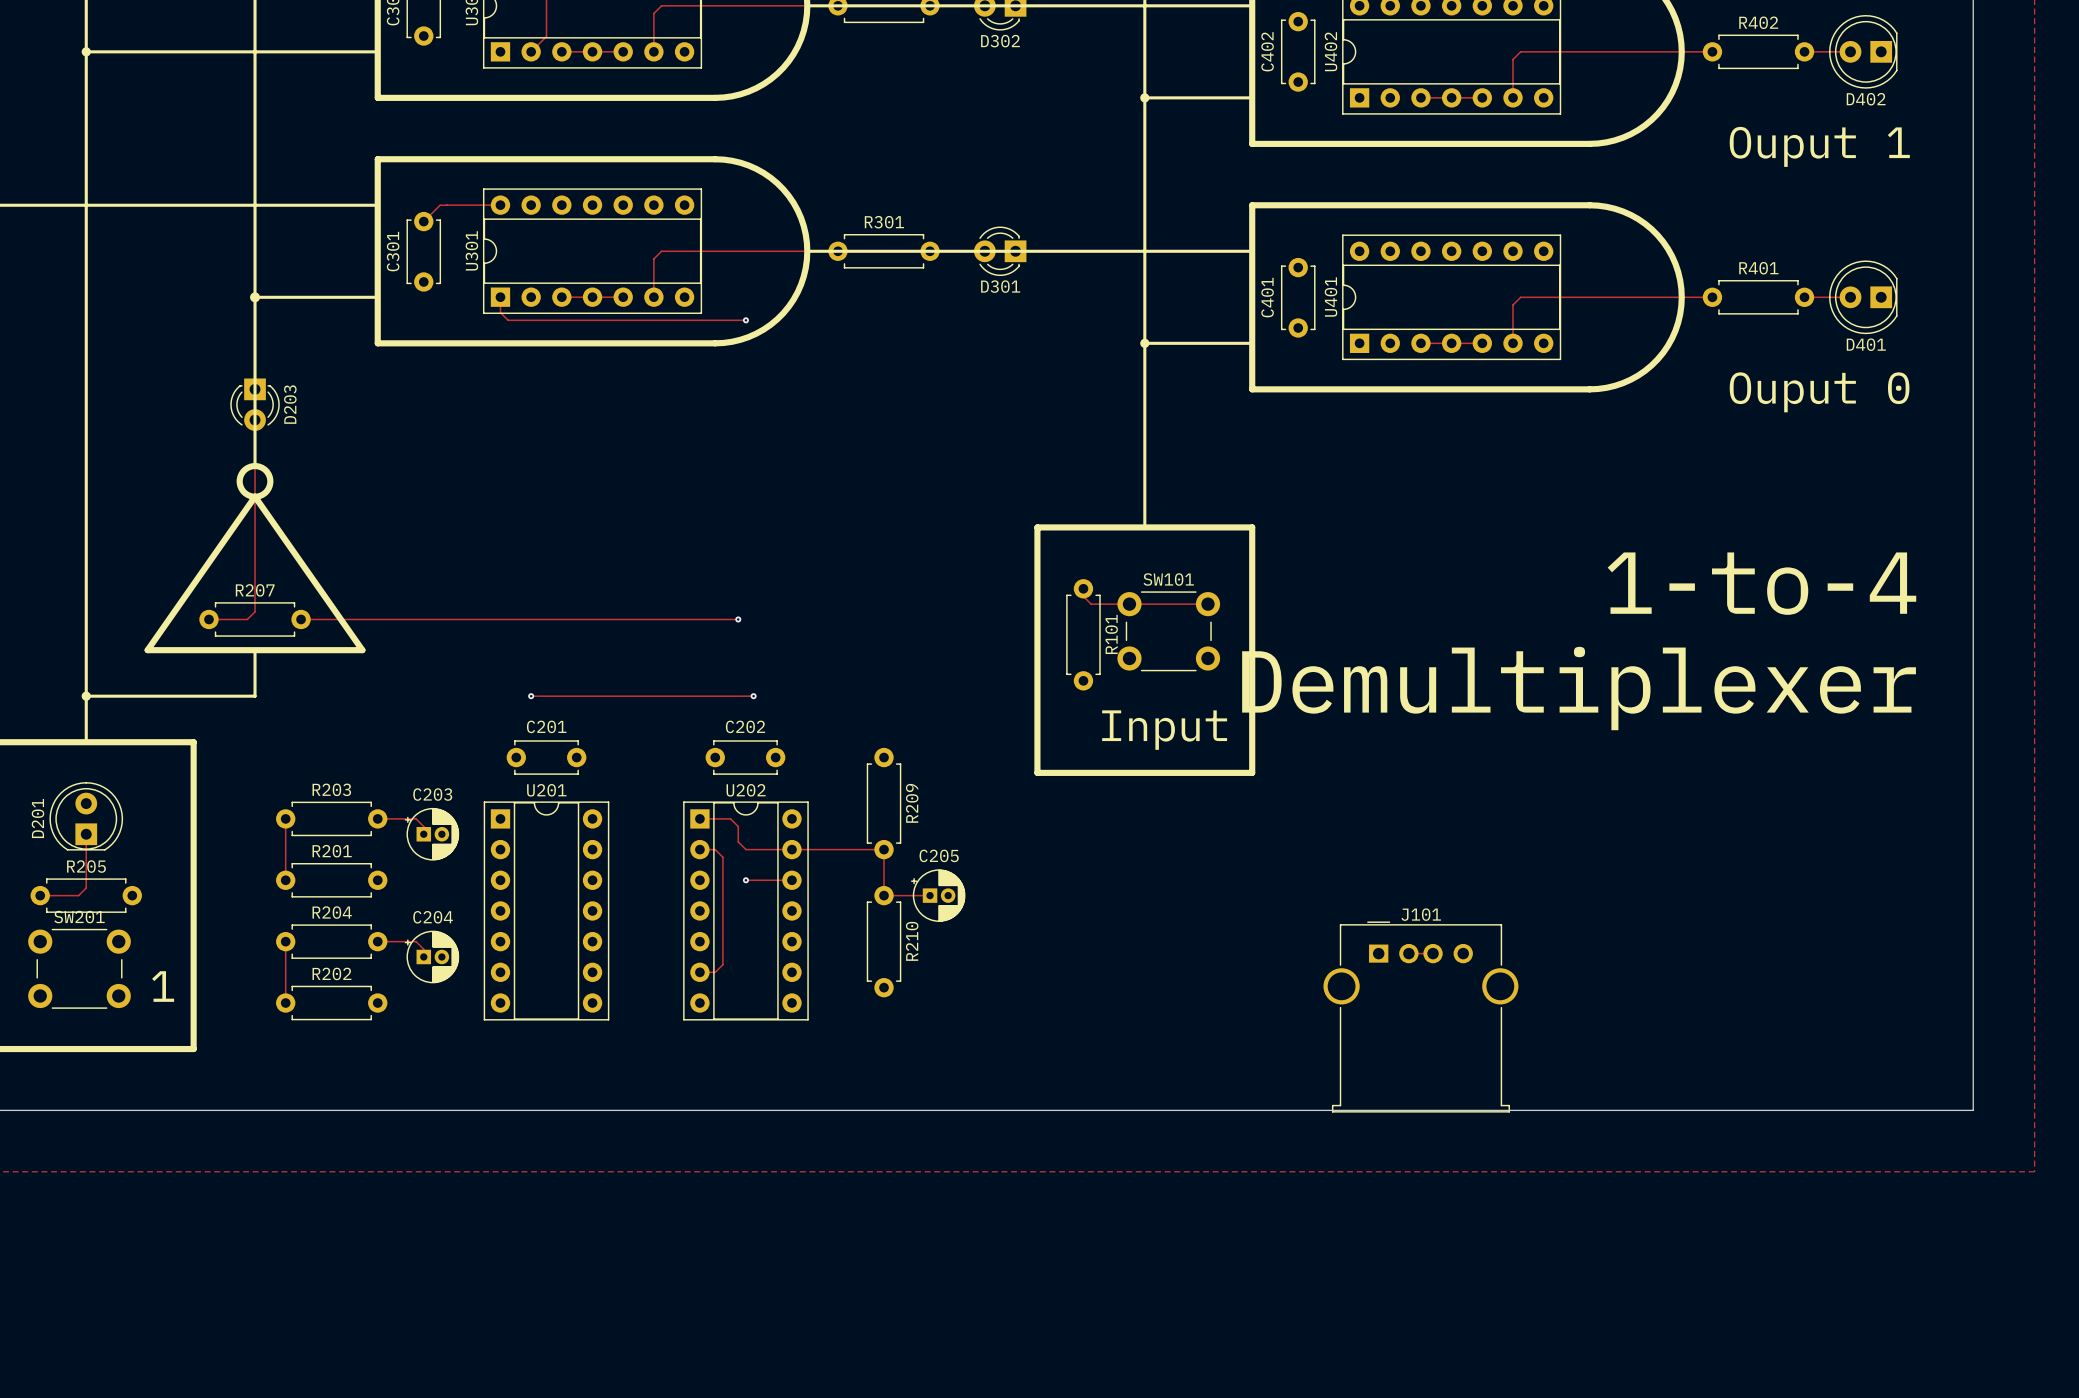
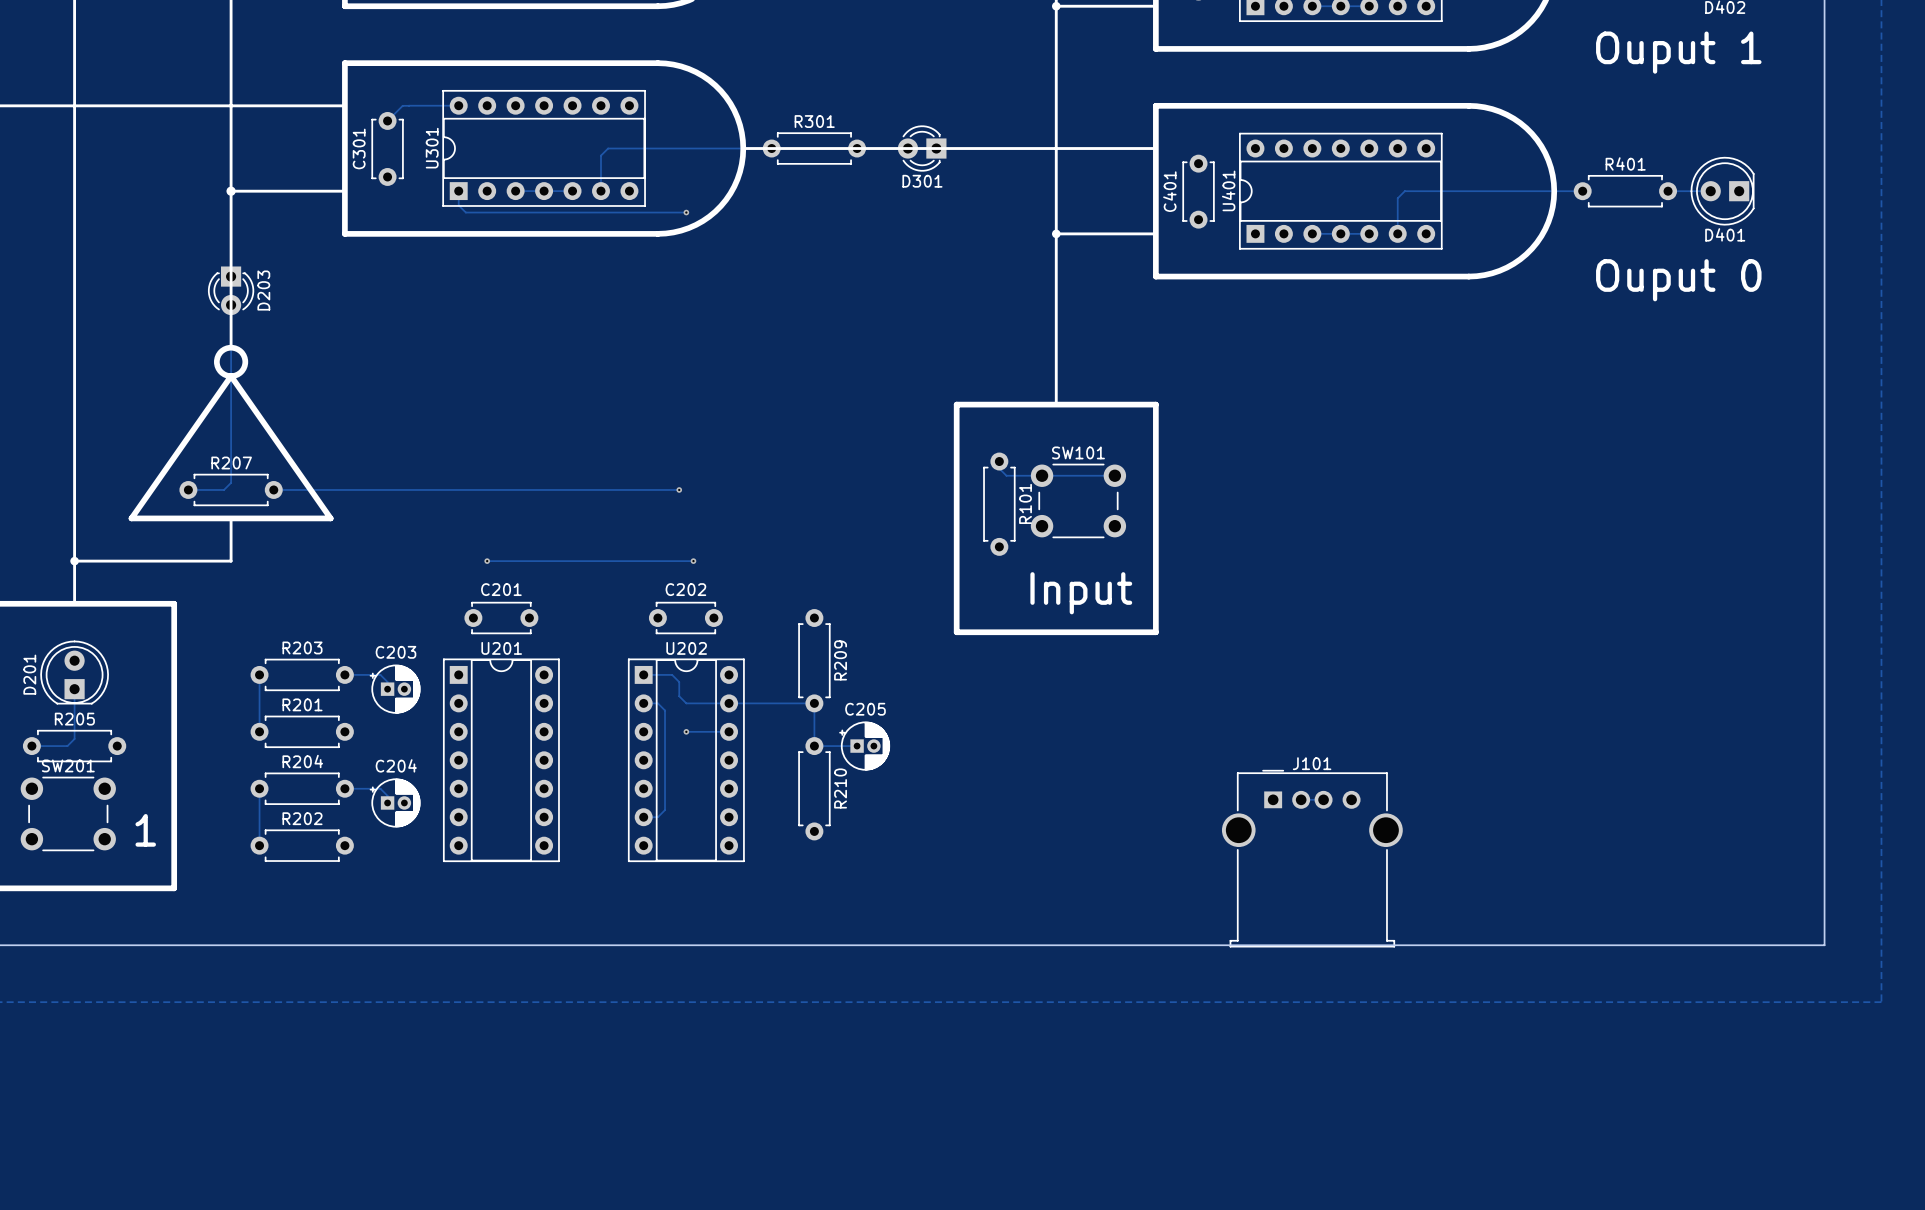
text: 1-to-4 (1761, 583) -> none
text: Demultiplexer (1579, 688) -> none

